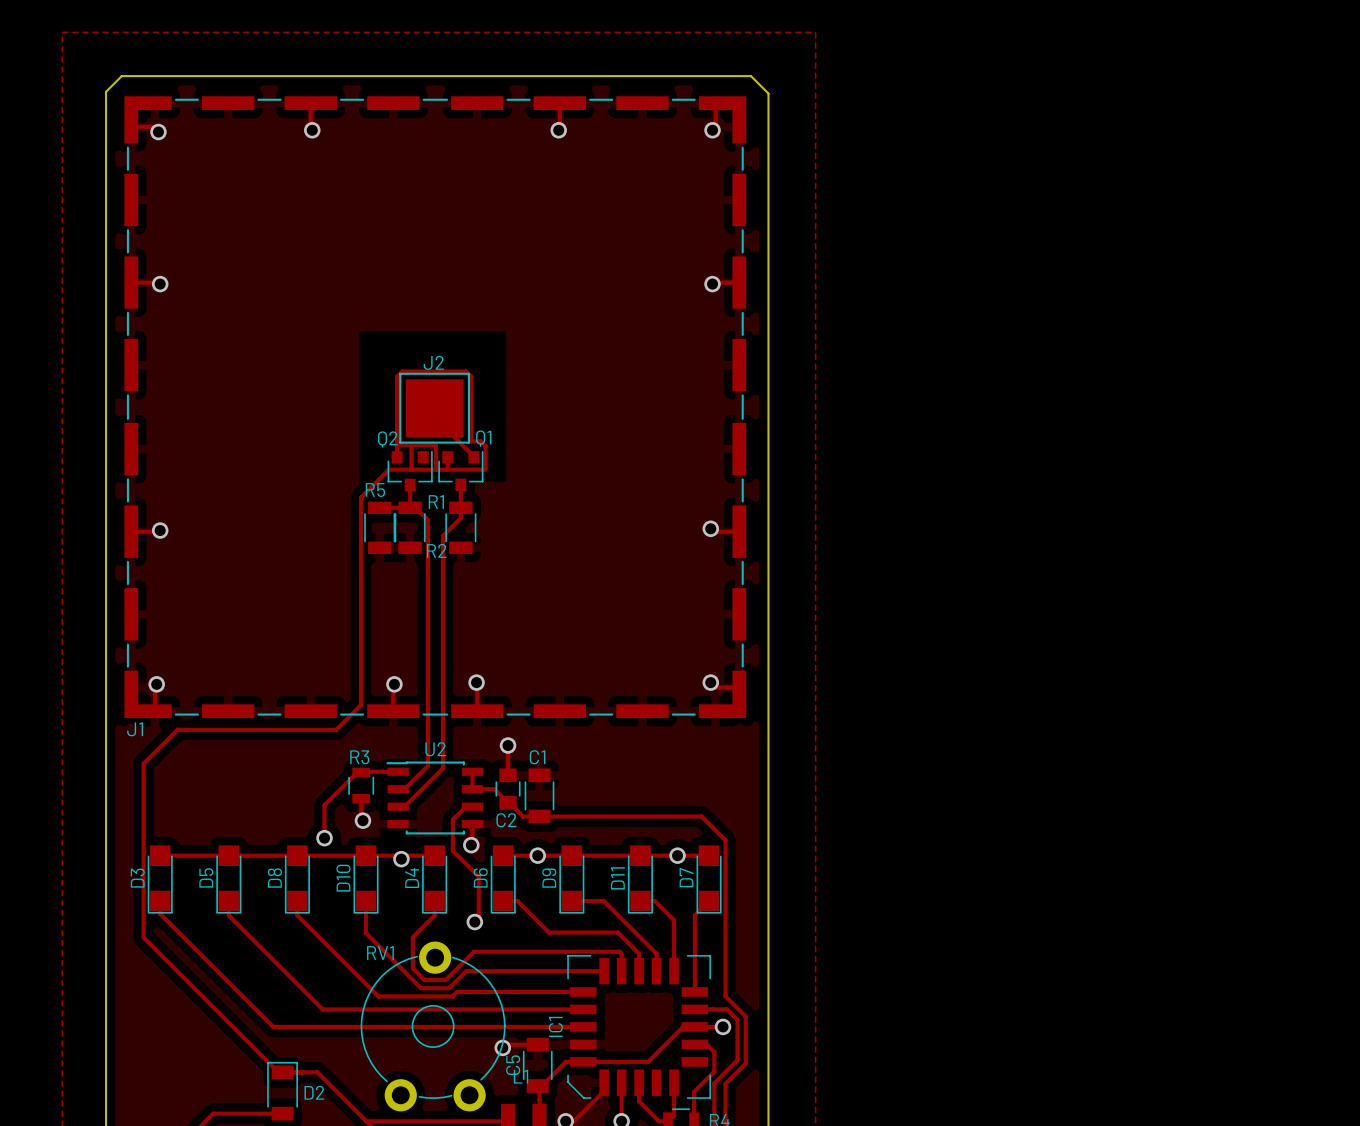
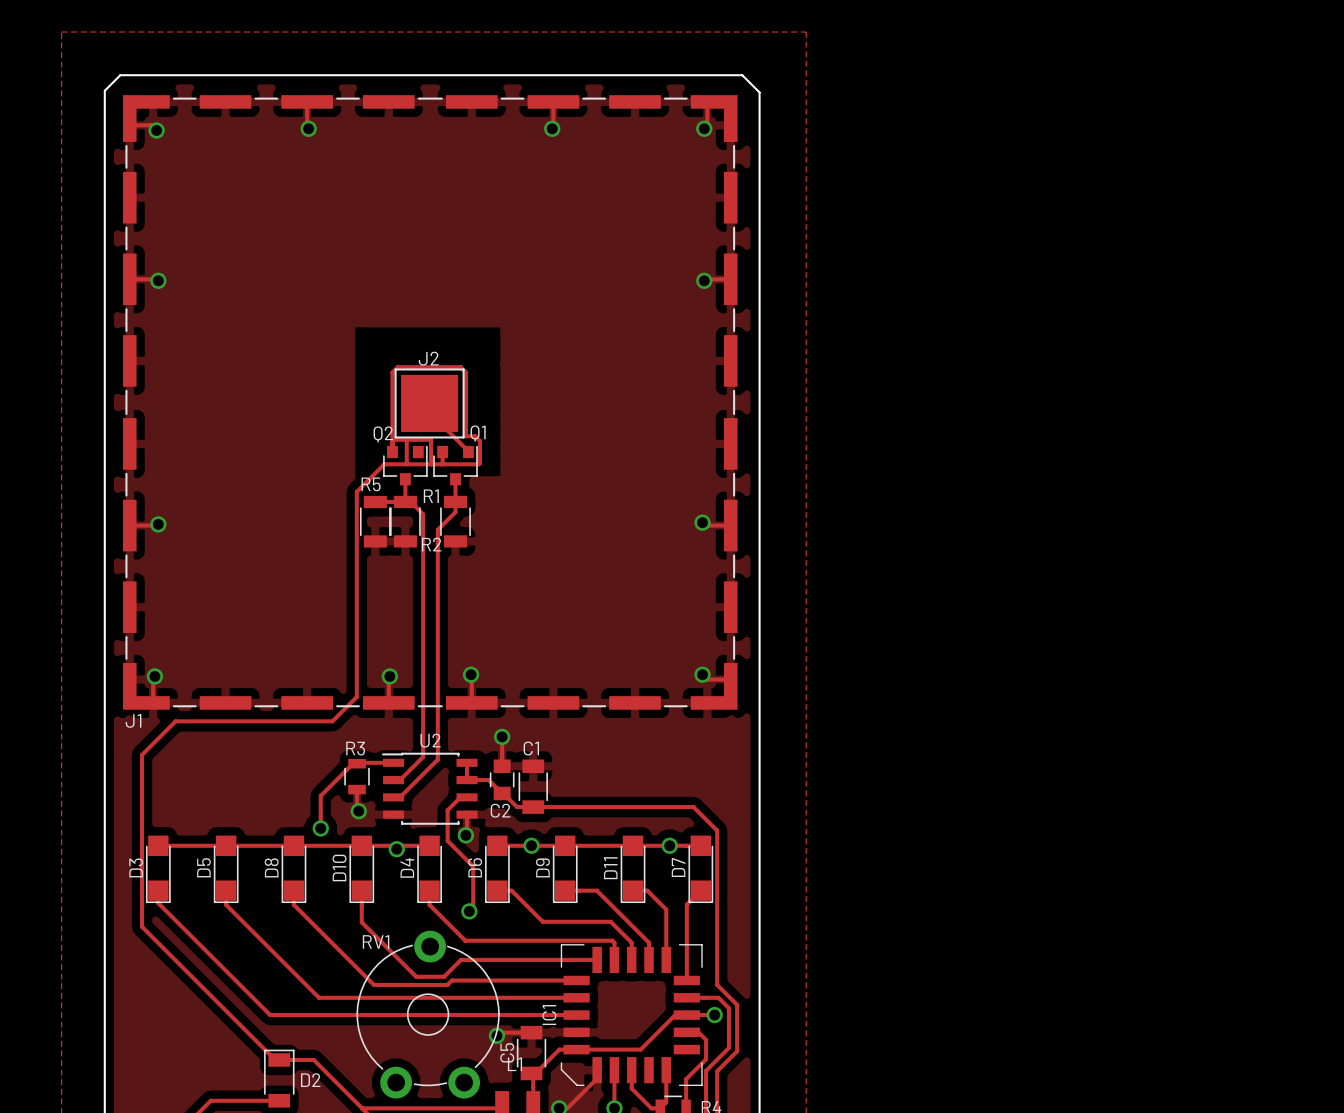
track: (434, 915) (412, 937) (412, 968) (424, 979) (445, 979) (474, 951) -> (429, 904) (465, 940) (468, 940)

